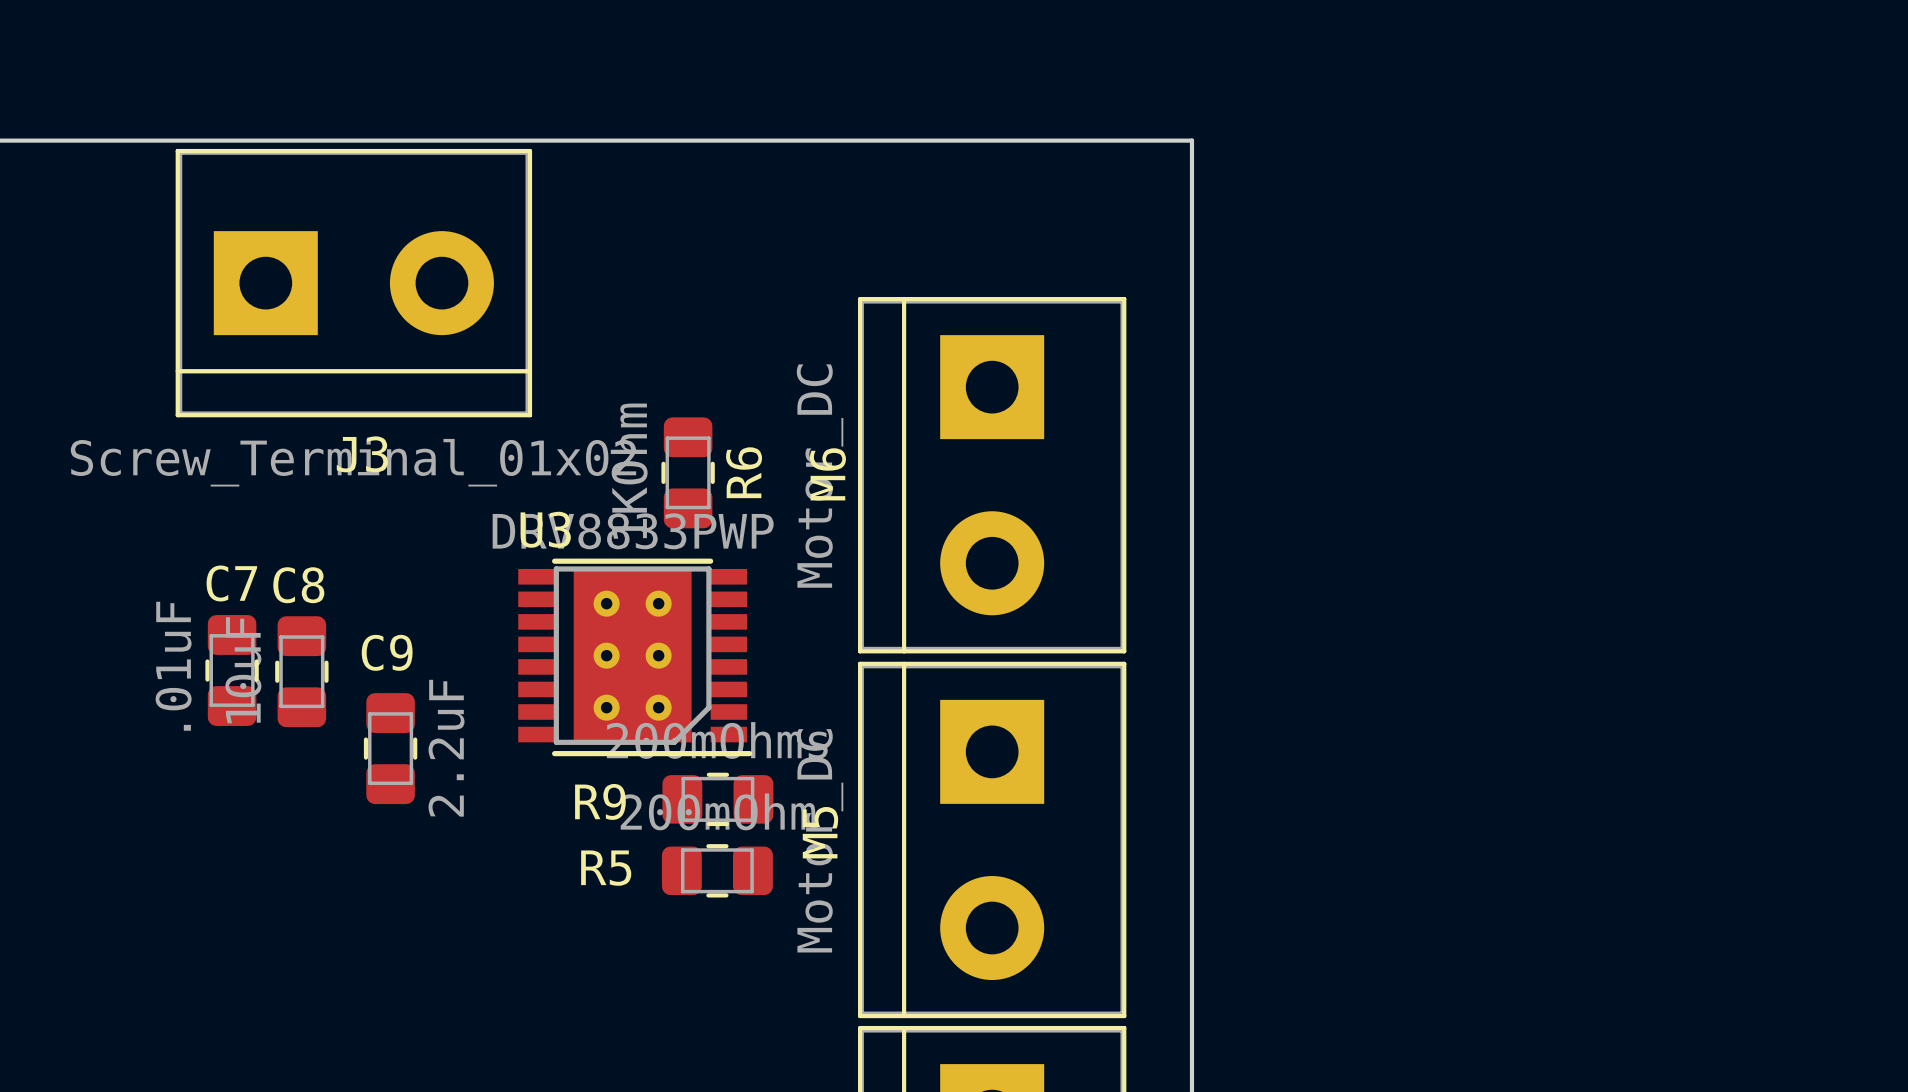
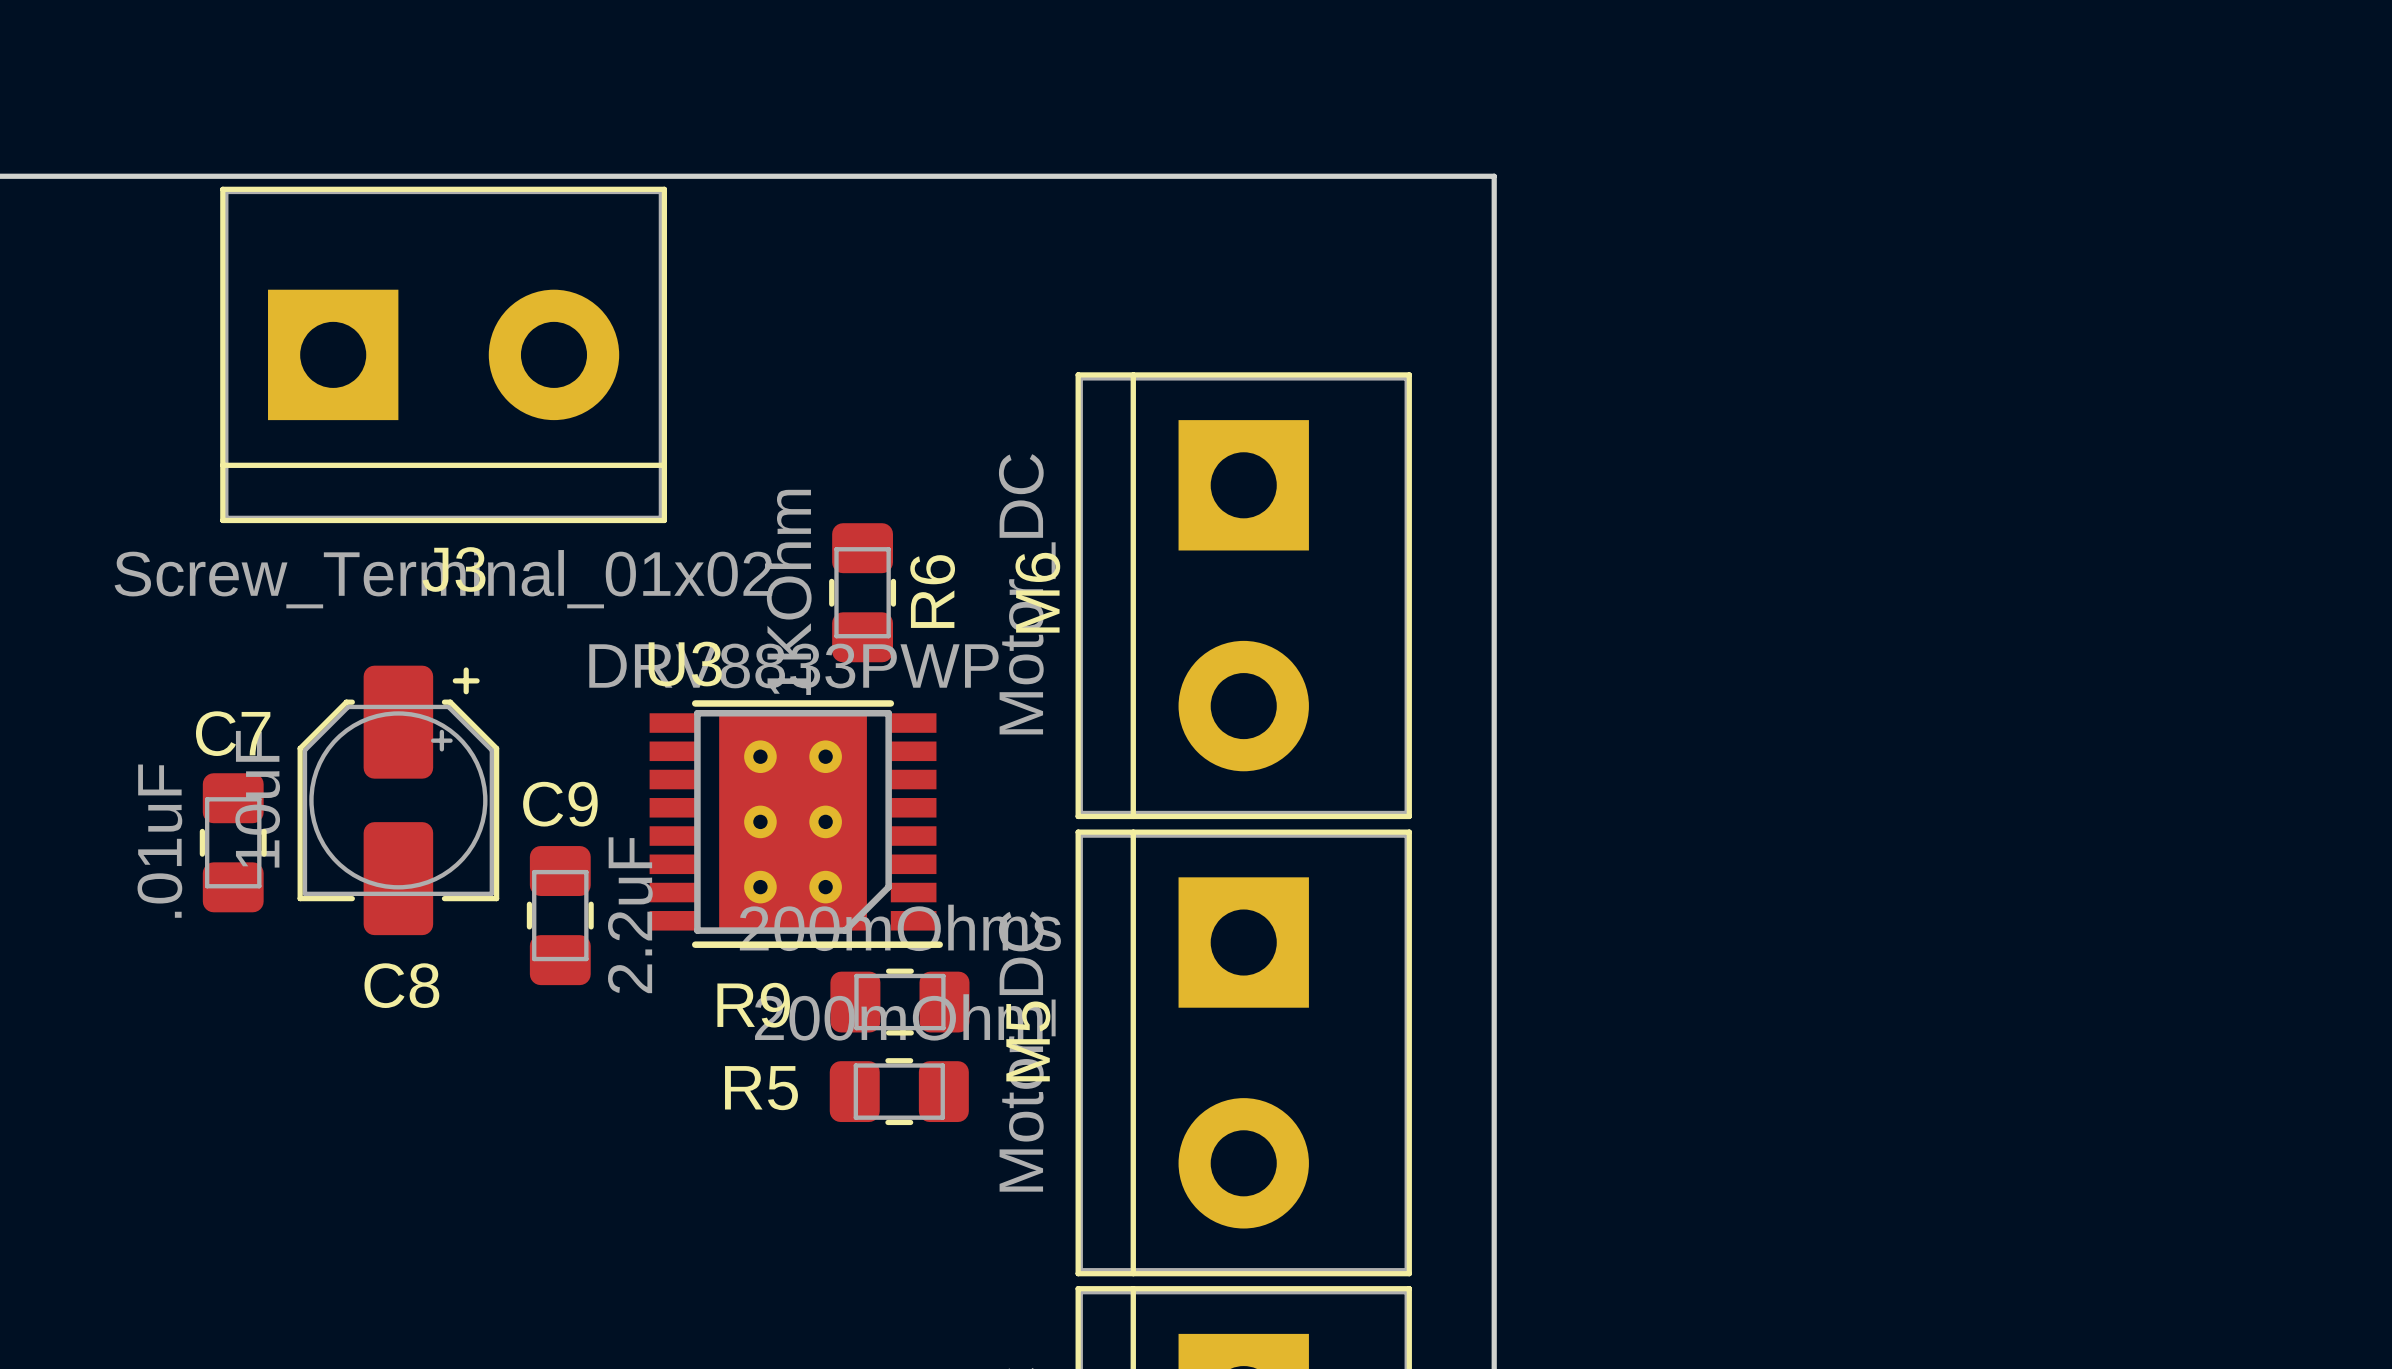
C8 name position: C8 (298, 585) -> C8 (401, 985)
C8 footprint: [275, 616, 329, 728] -> [297, 665, 500, 936]
C9 name position: C9 (387, 652) -> C9 (560, 804)
C7 position: (232, 670) -> (233, 842)
C9 position: (390, 748) -> (560, 915)

